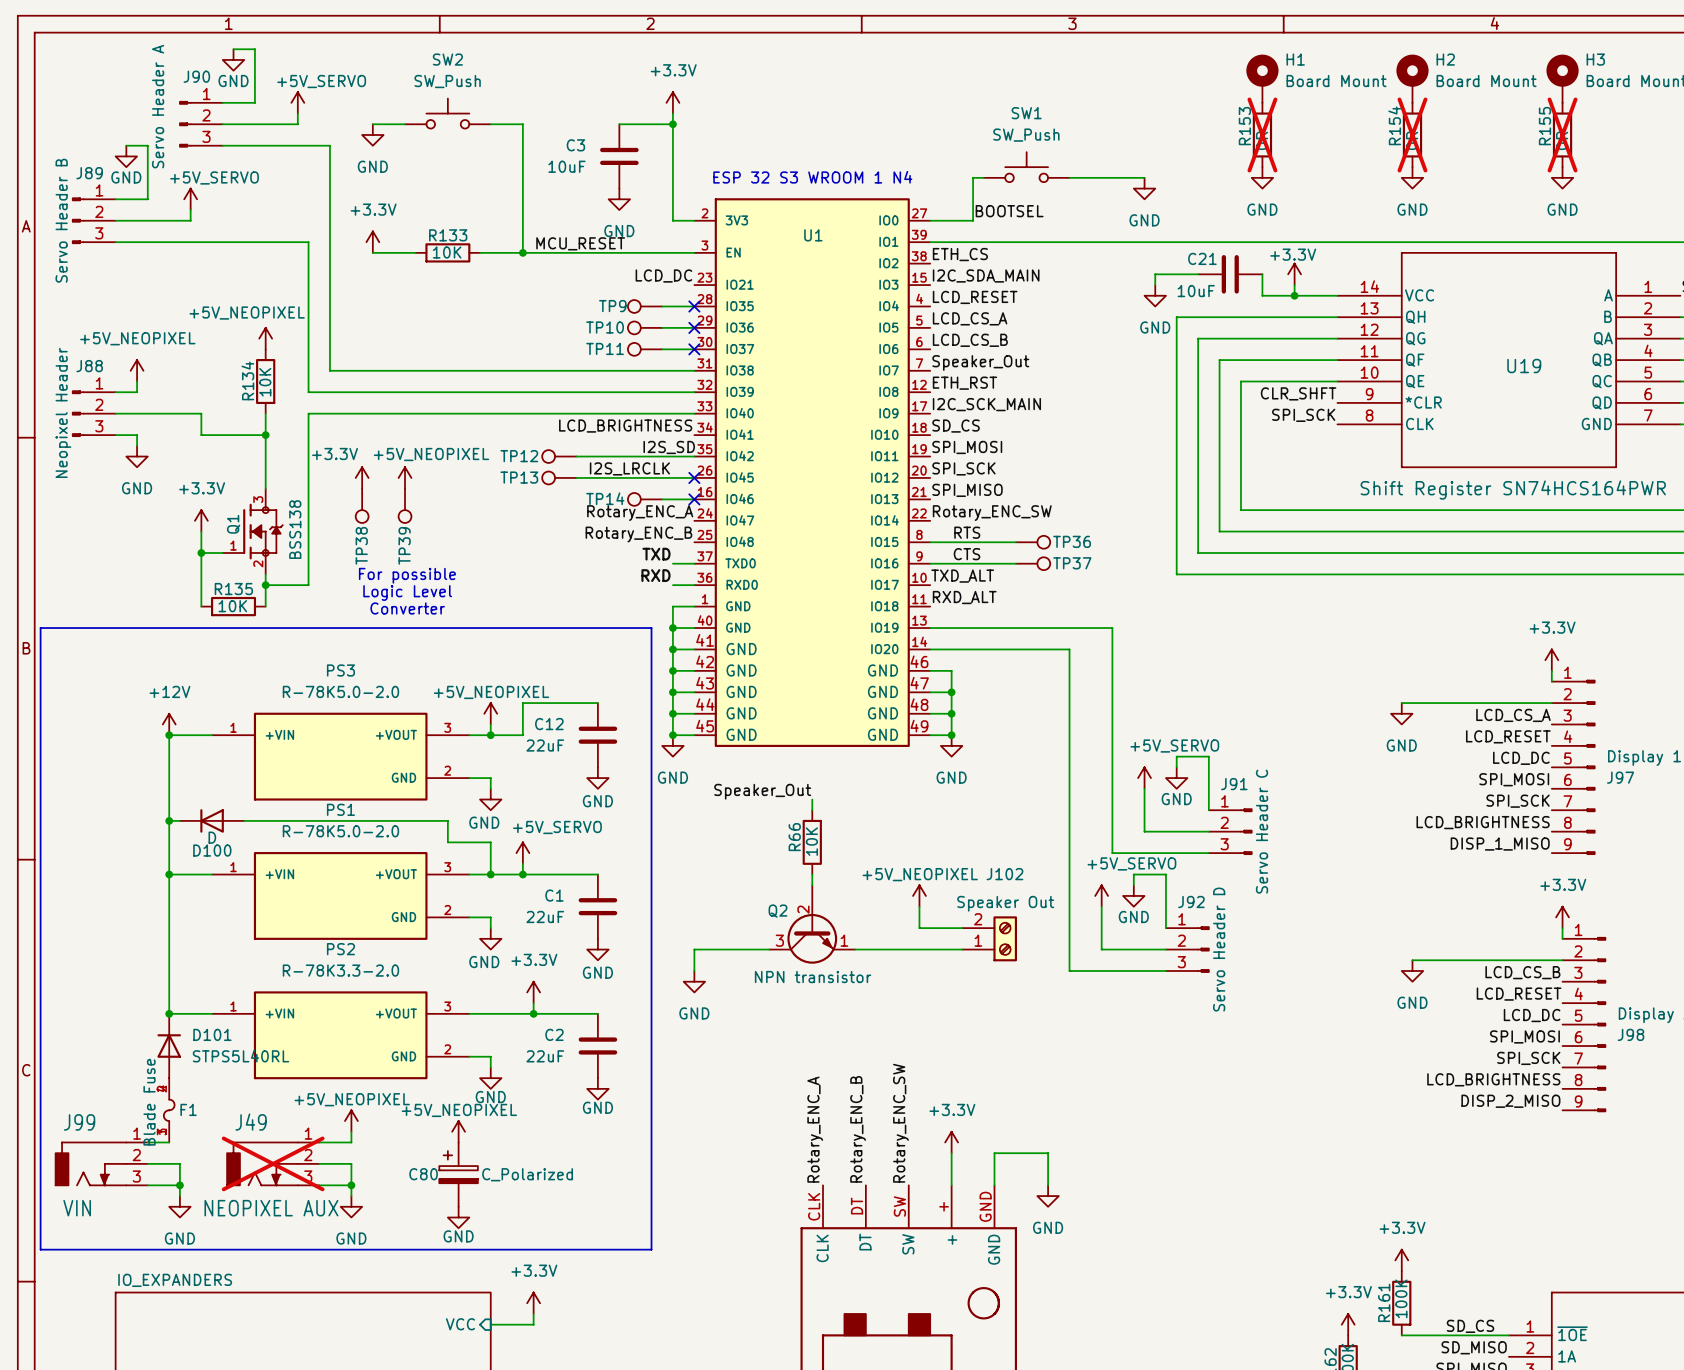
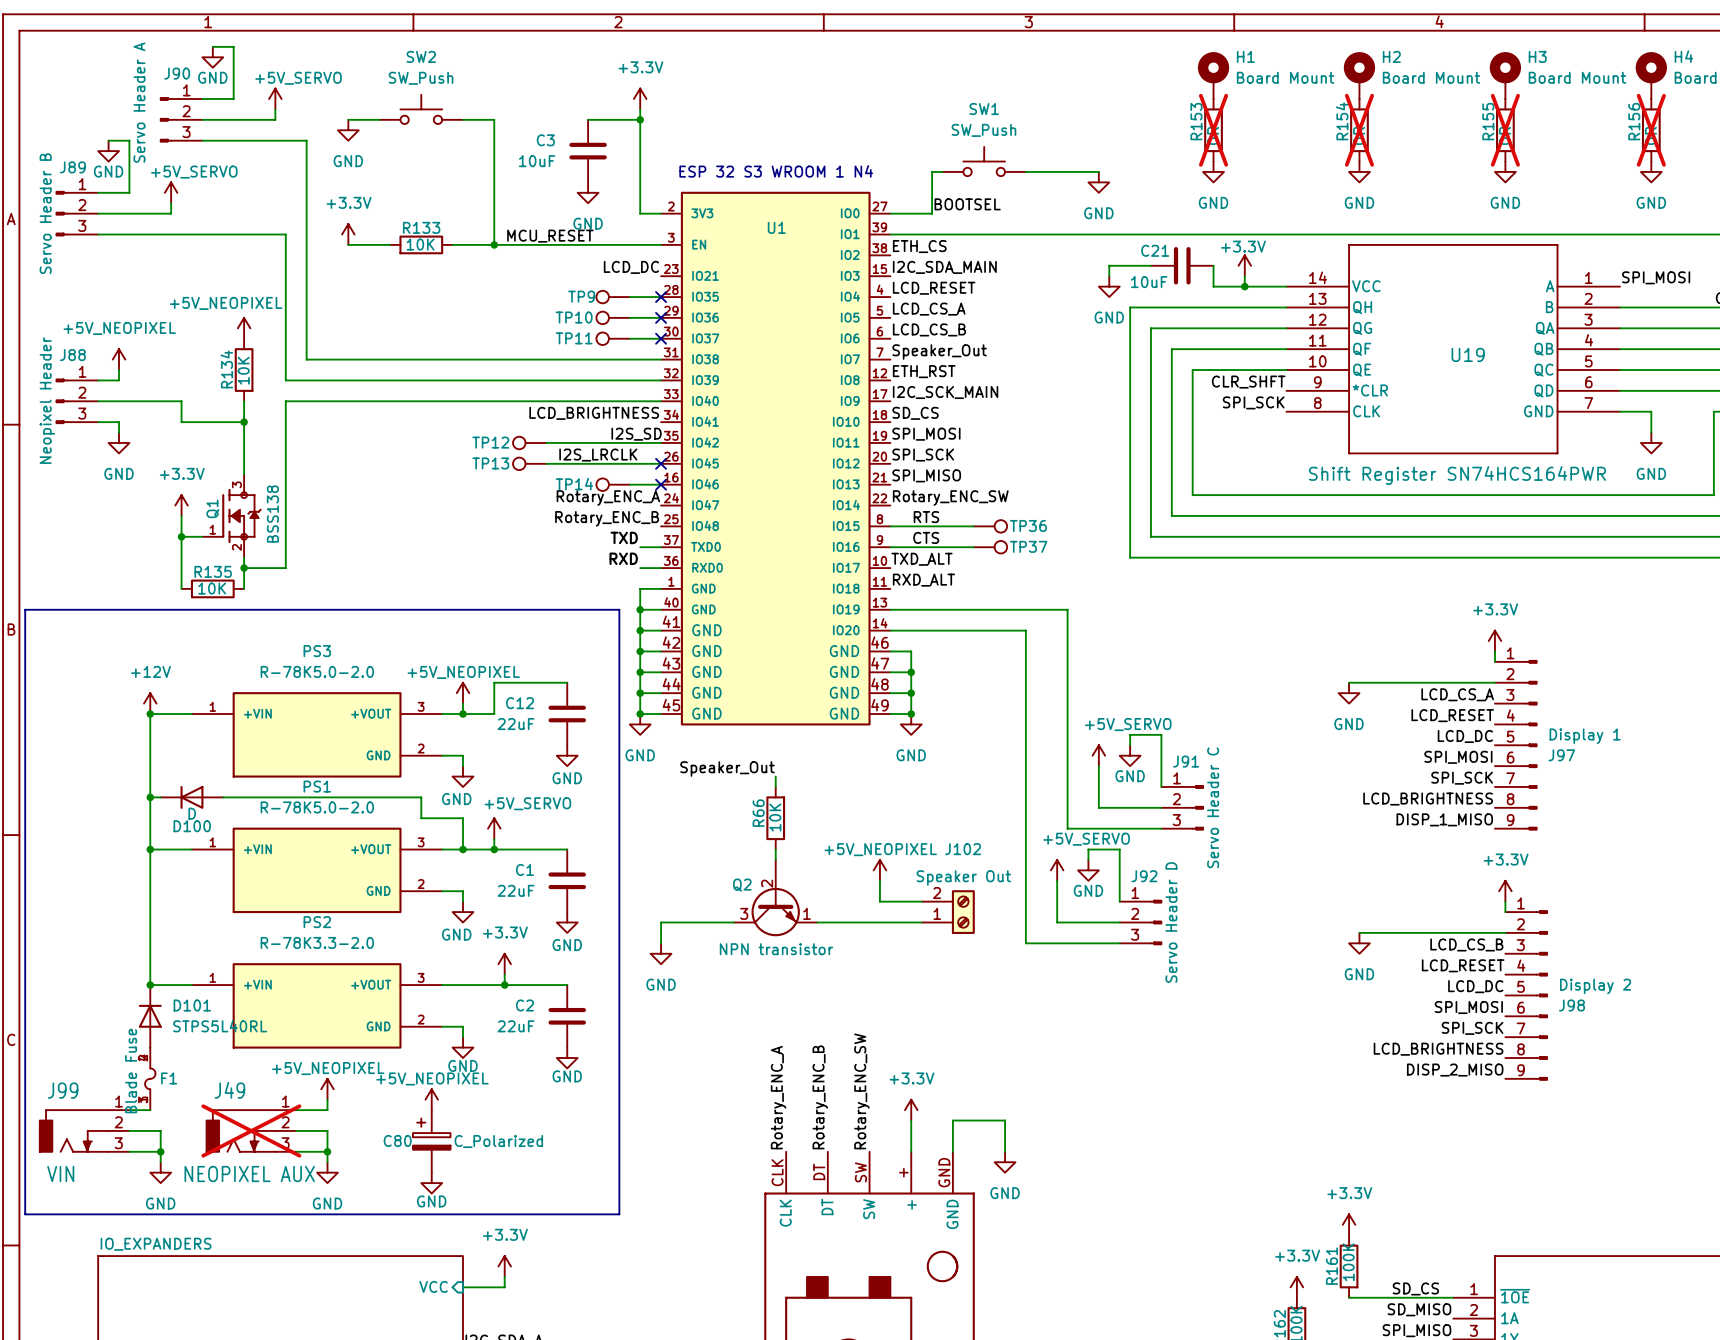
power symbol: +3.3V (362, 477) -> none
power symbol: +5V_NEOPIXEL (405, 477) -> none
TP38: (362, 505) -> none
TP39: (405, 505) -> none
text: For possible (407, 575) -> none
text: Logic Level (407, 592) -> none
text: Converter (407, 608) -> none

